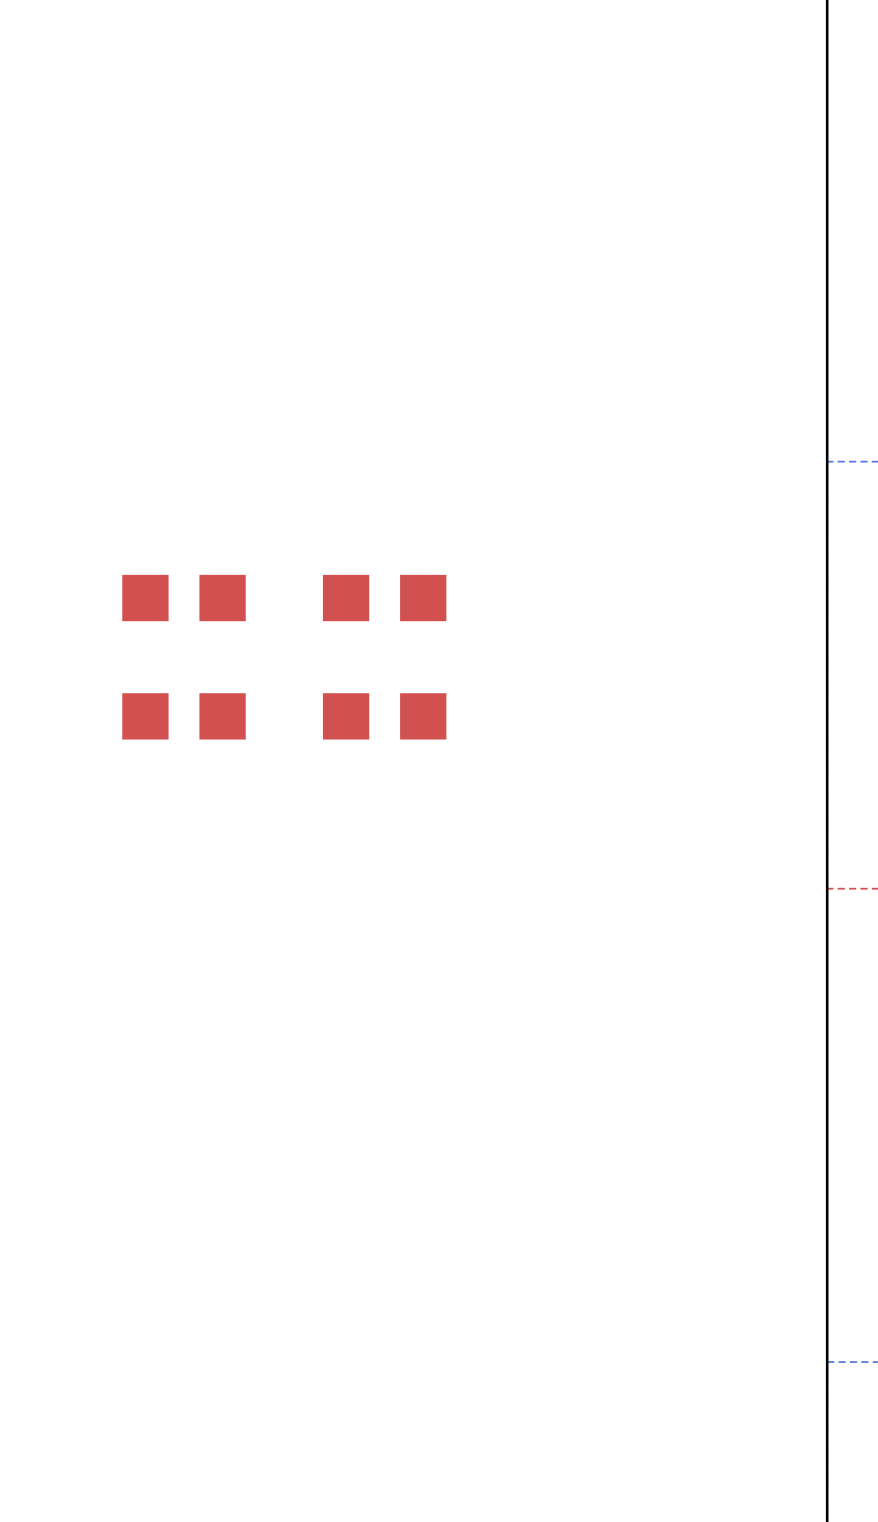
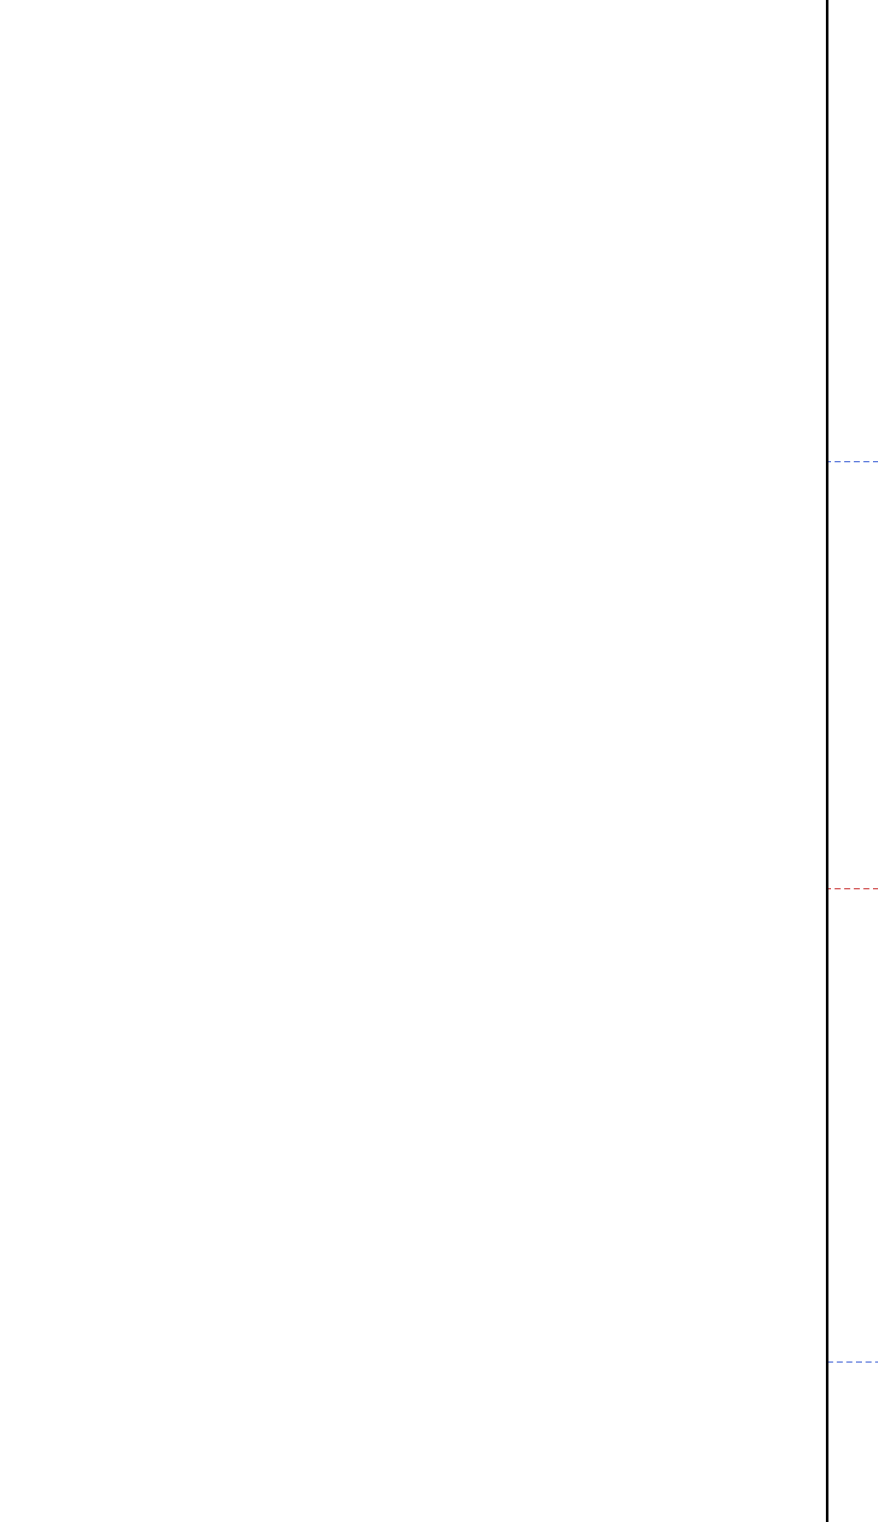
part: (184, 598) -> none
part: (384, 598) -> none
part: (184, 716) -> none
part: (384, 716) -> none

